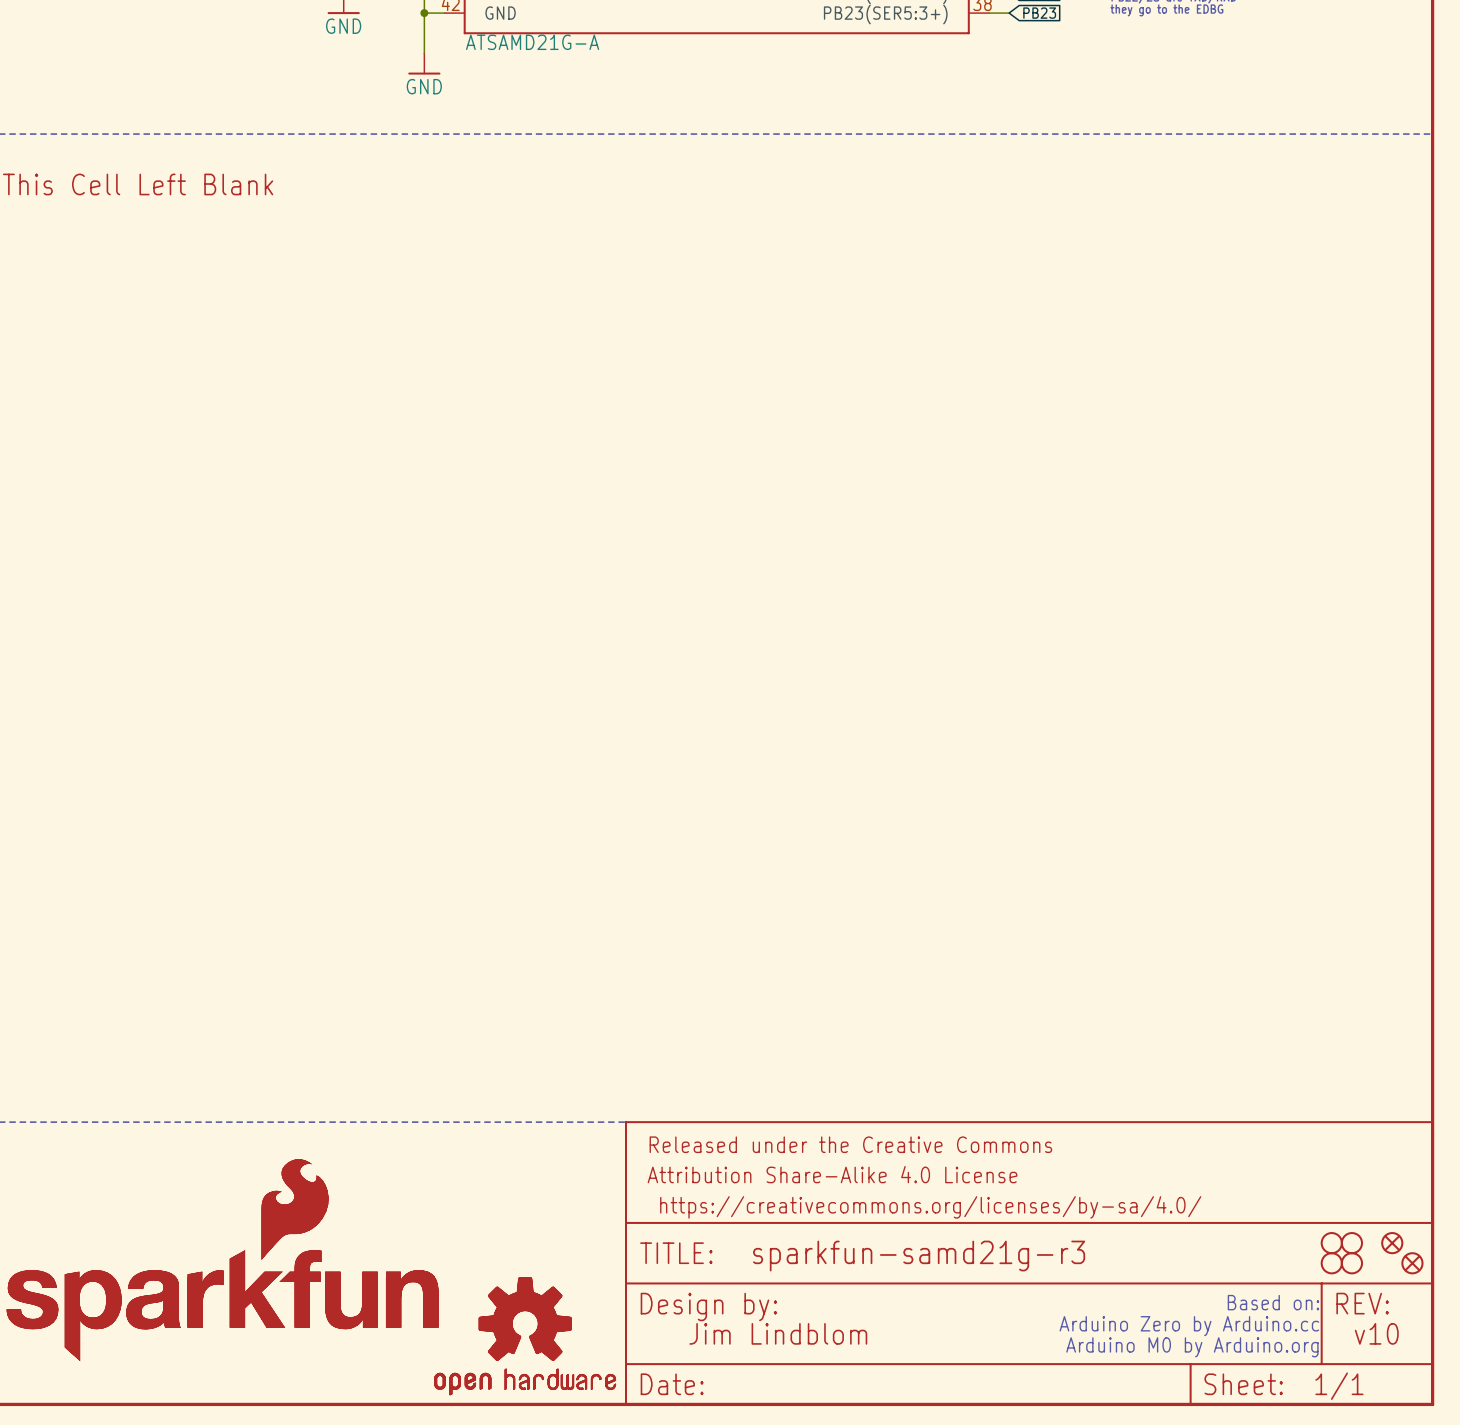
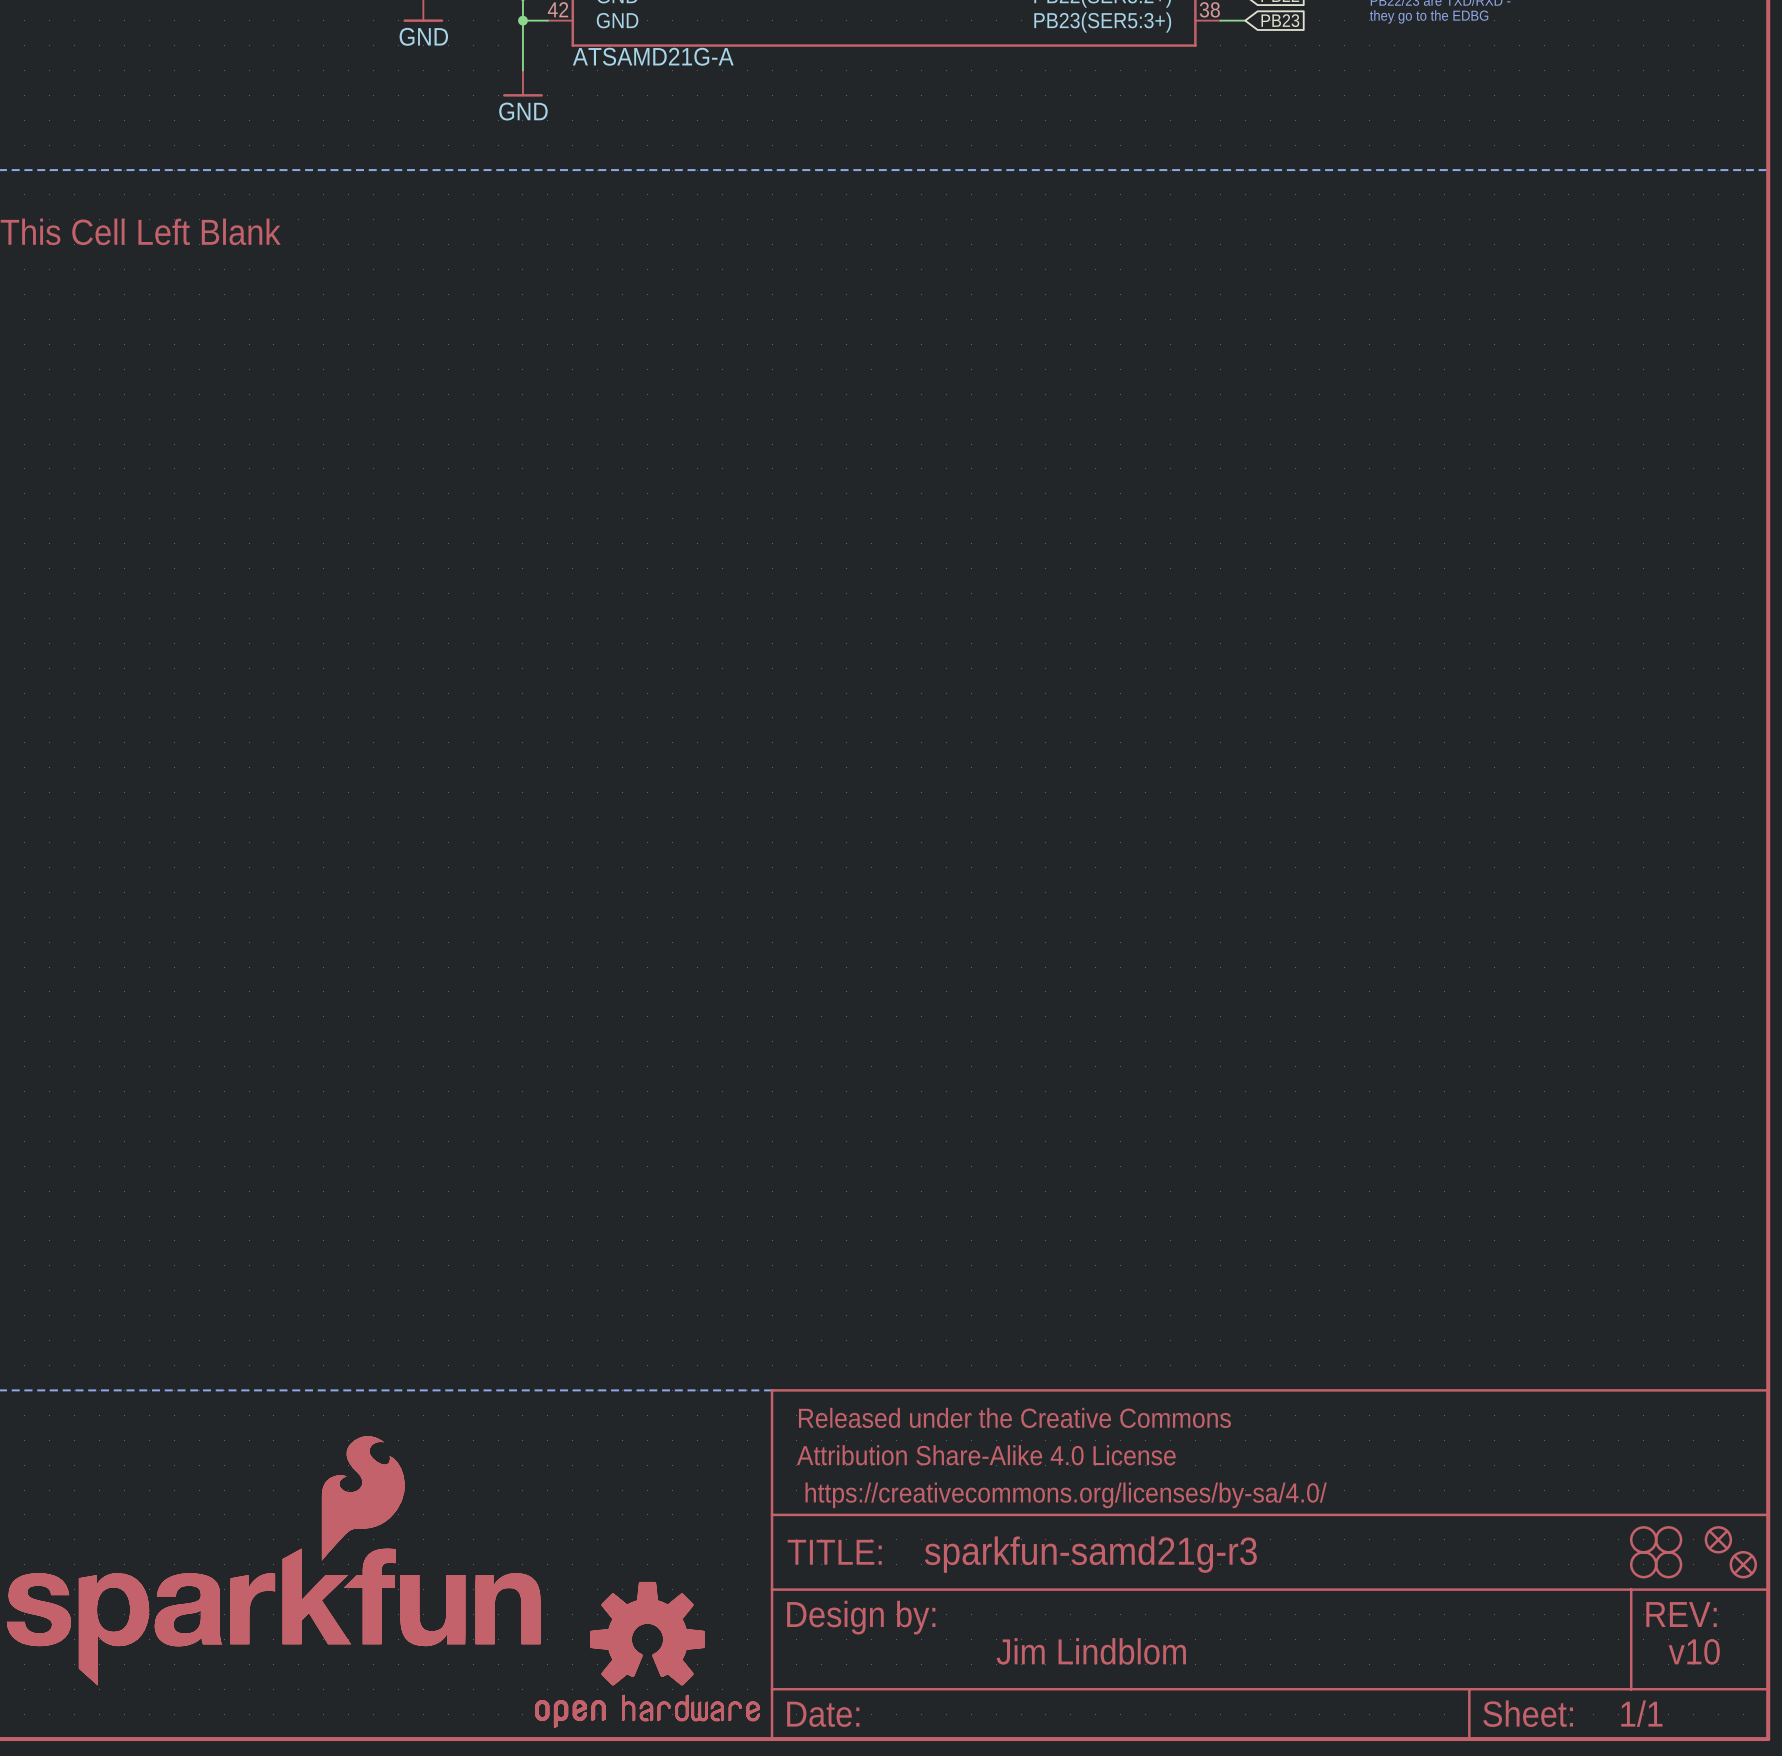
text: Based on: (1273, 1302) -> none
text: Arduino Zero by Arduino.cc (1189, 1326) -> none
text position: Jim Lindblom (778, 1333) -> Jim Lindblom (1091, 1651)
text: Arduino M0 by Arduino.org (1192, 1347) -> none

